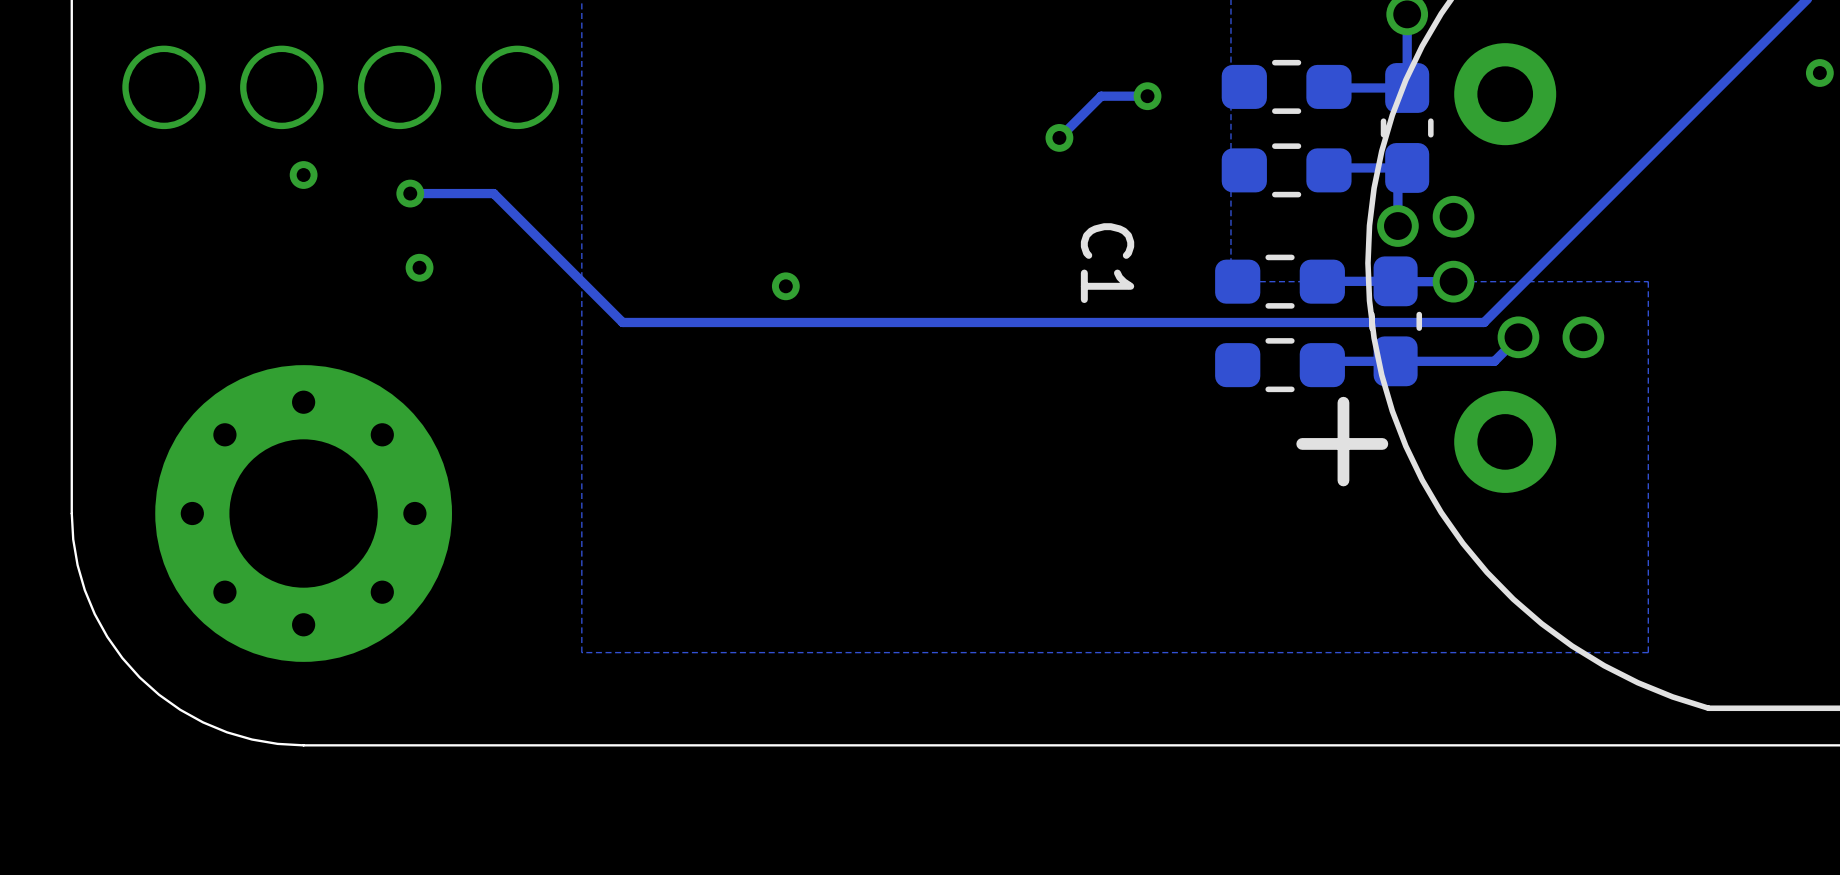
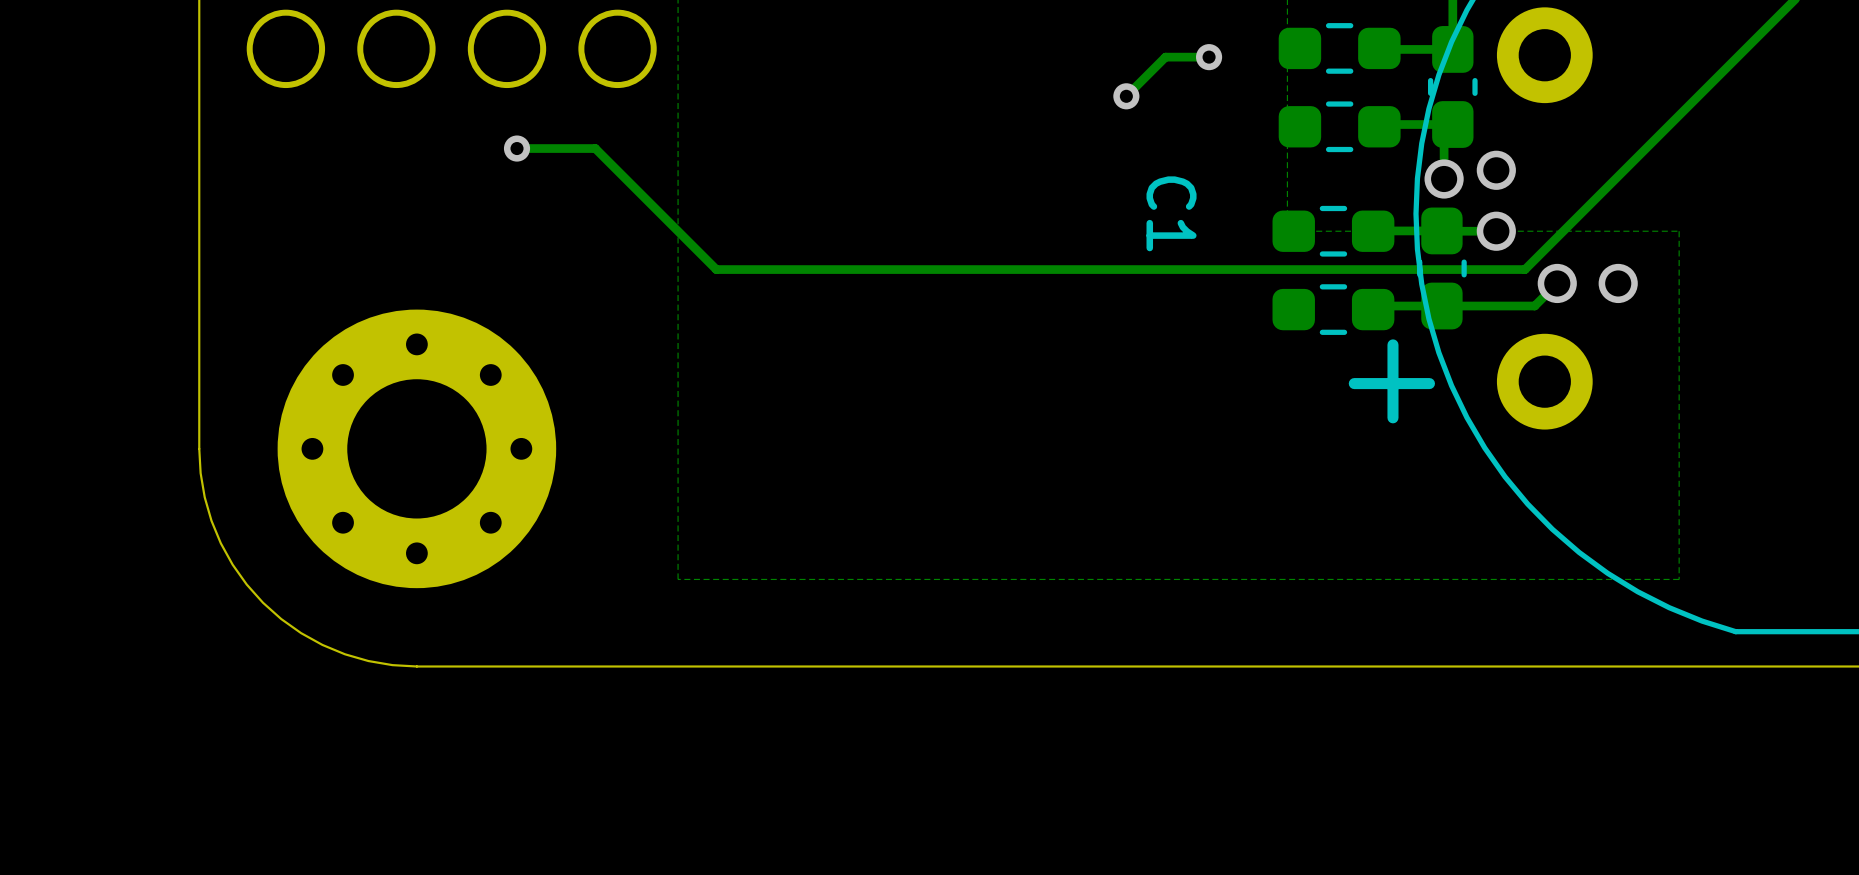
via: (1819, 73) -> none
via: (303, 175) -> none
via: (419, 267) -> none
via: (785, 286) -> none

